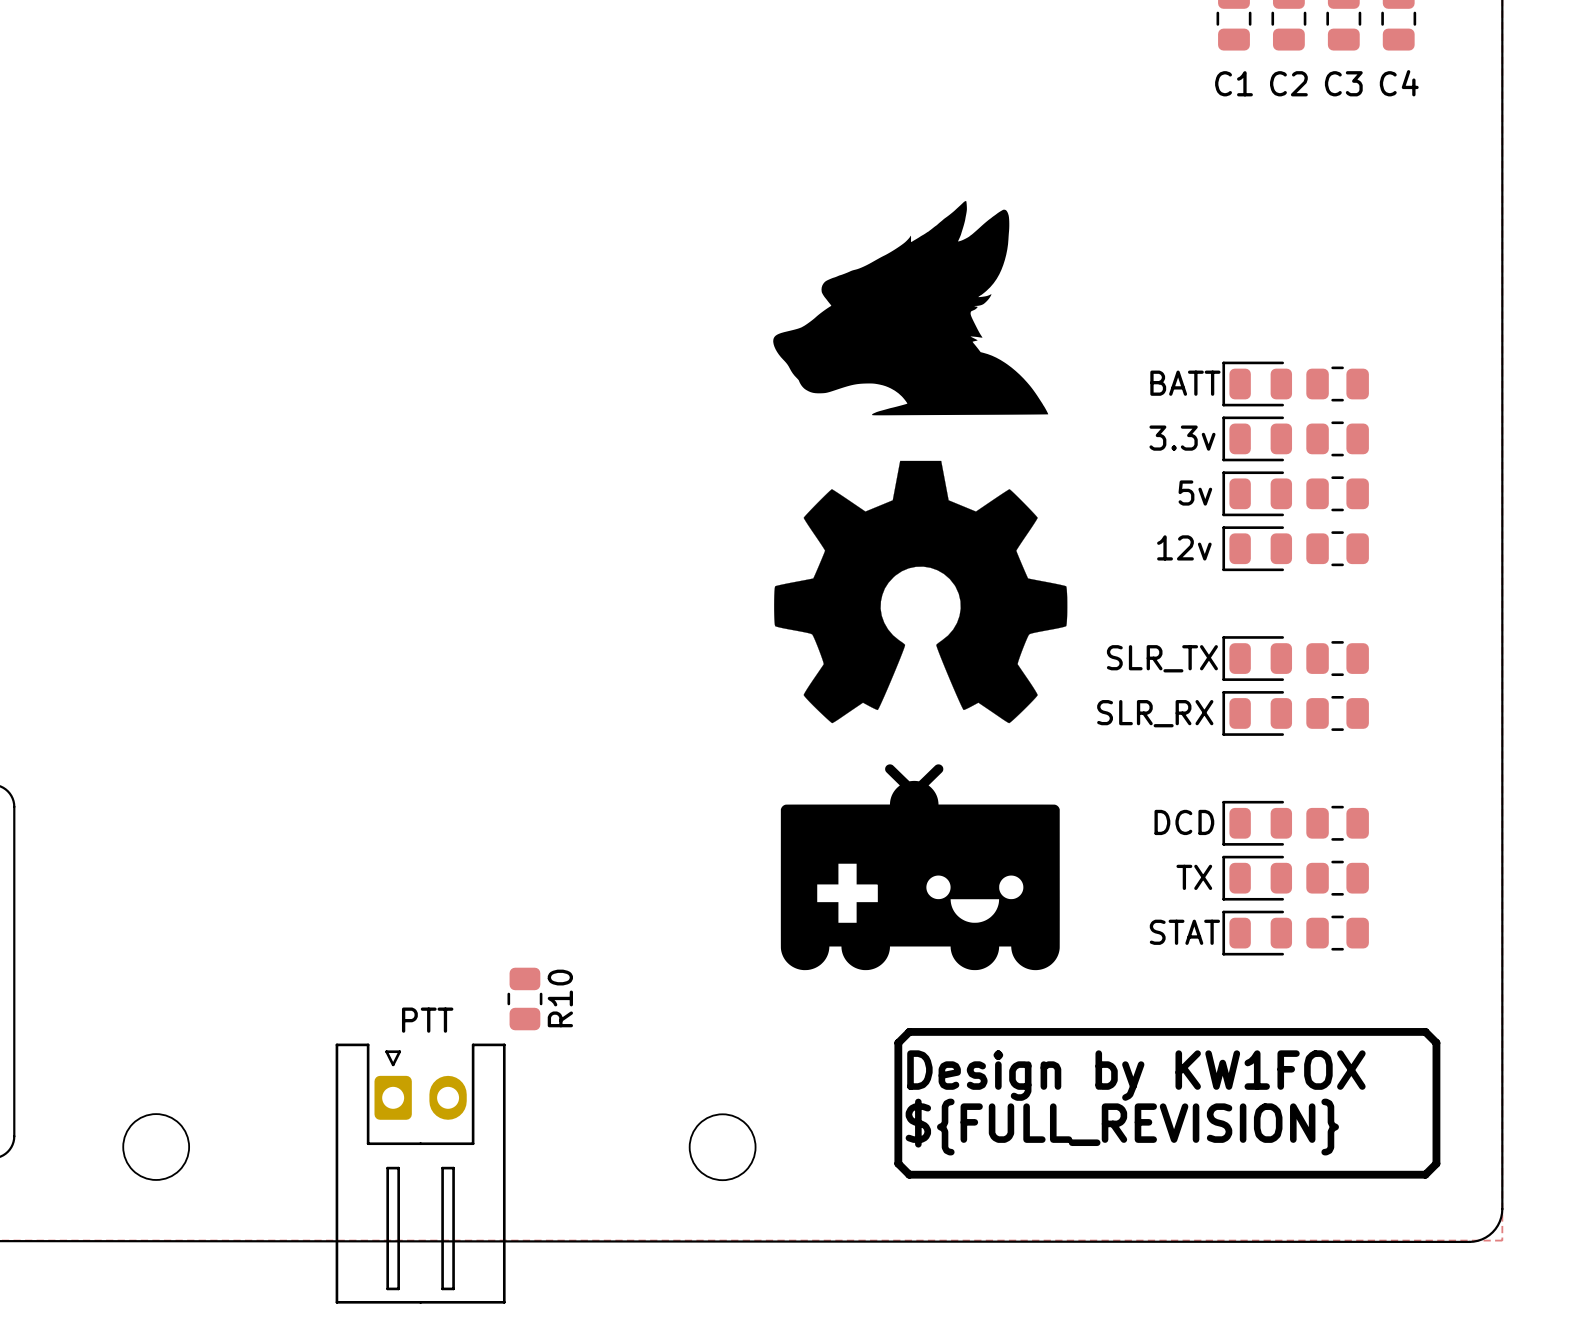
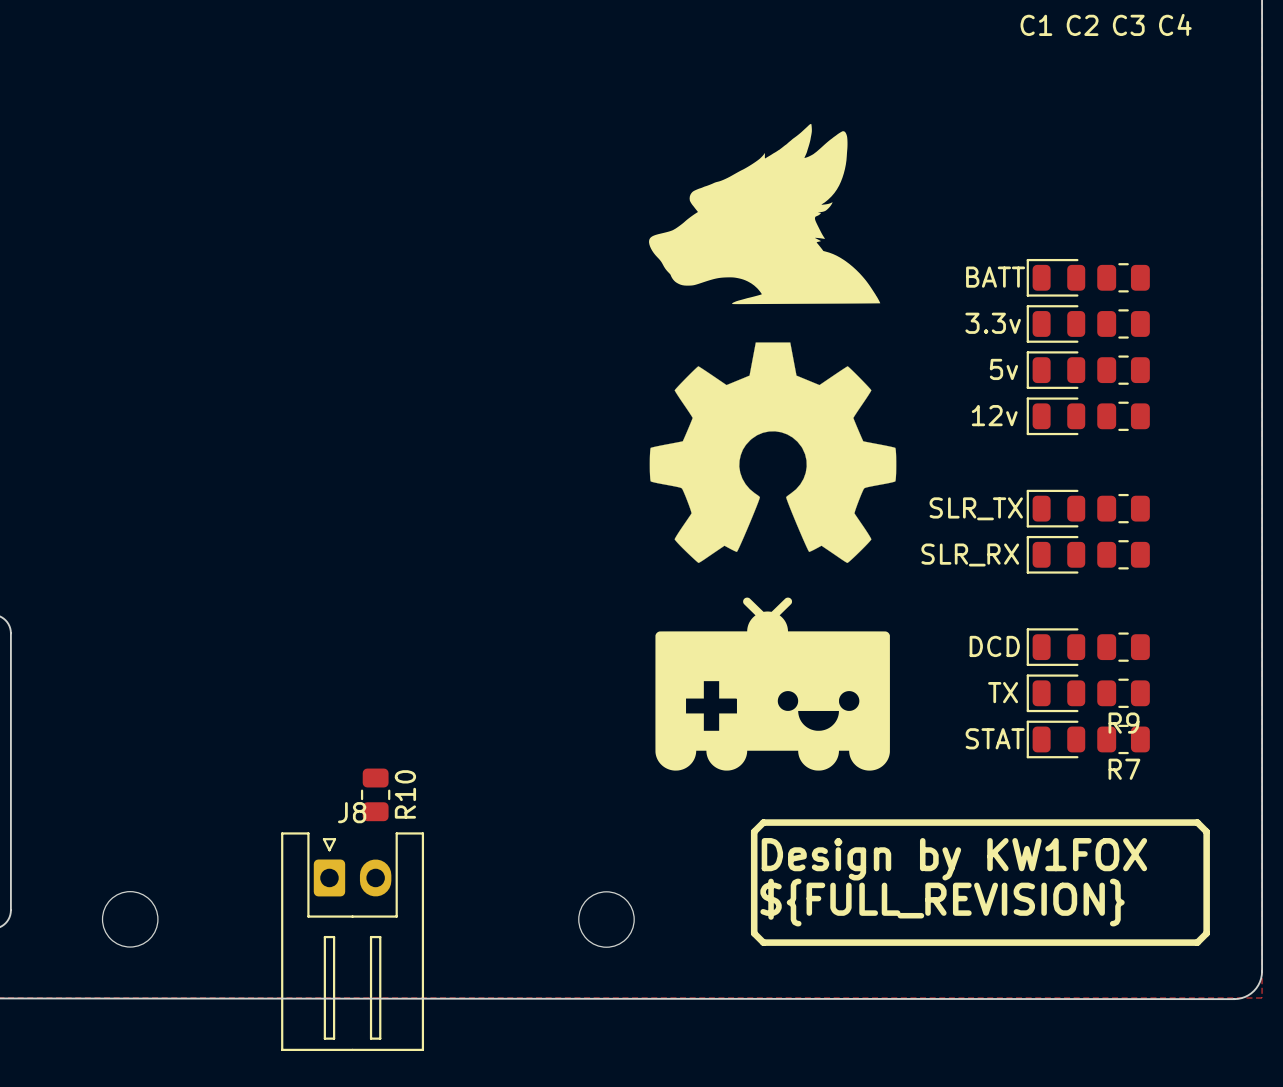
R9 name: none -> R9 (1123, 723)
R7 name: none -> R7 (1124, 769)
R10 position: (524, 998) -> (375, 794)
J8 name: none -> J8 (352, 812)
J8 value: PTT (427, 1020) -> none

